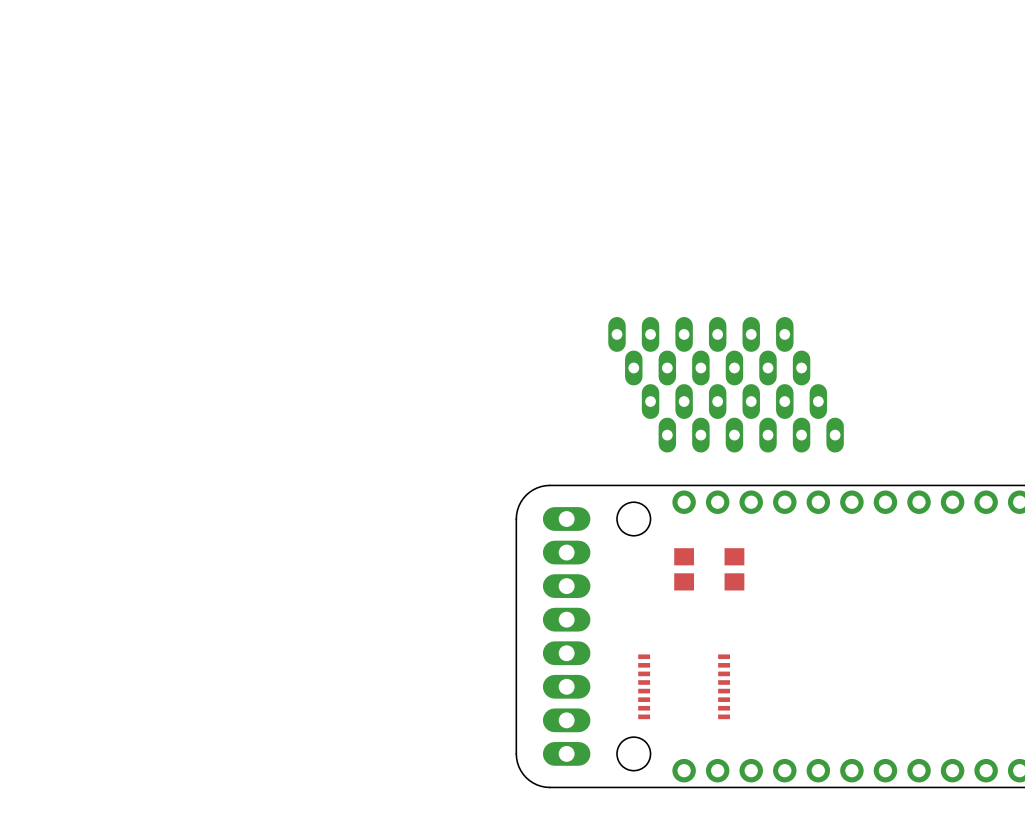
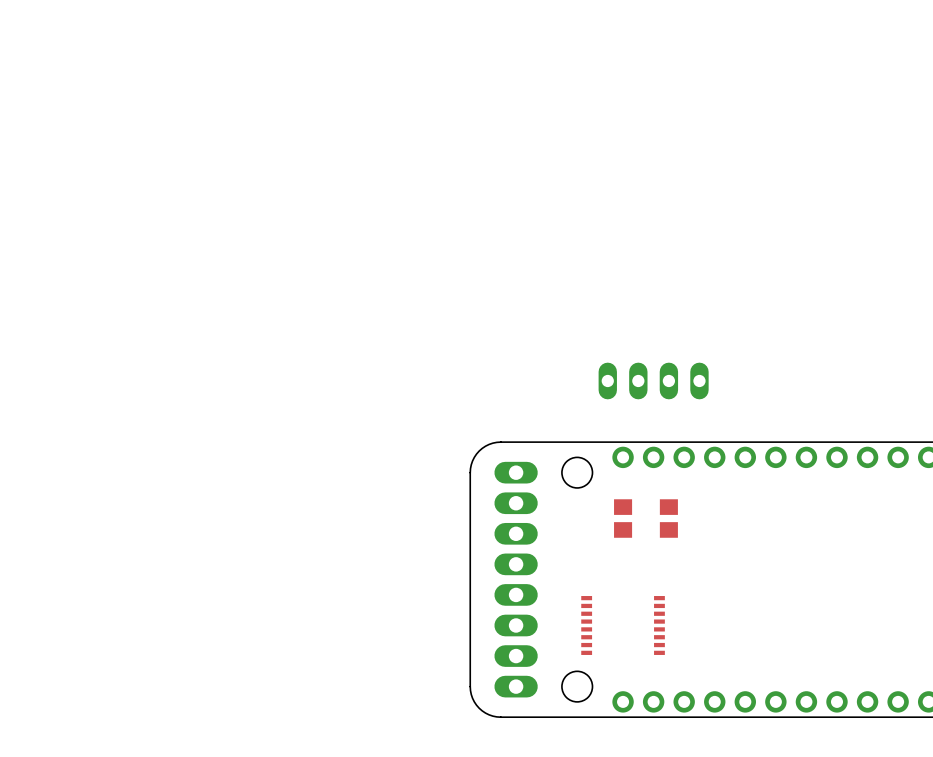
part: (700, 334) -> none
part: (717, 367) -> none
part: (734, 401) -> none
part: none -> (653, 380)
part: (751, 435) -> none

